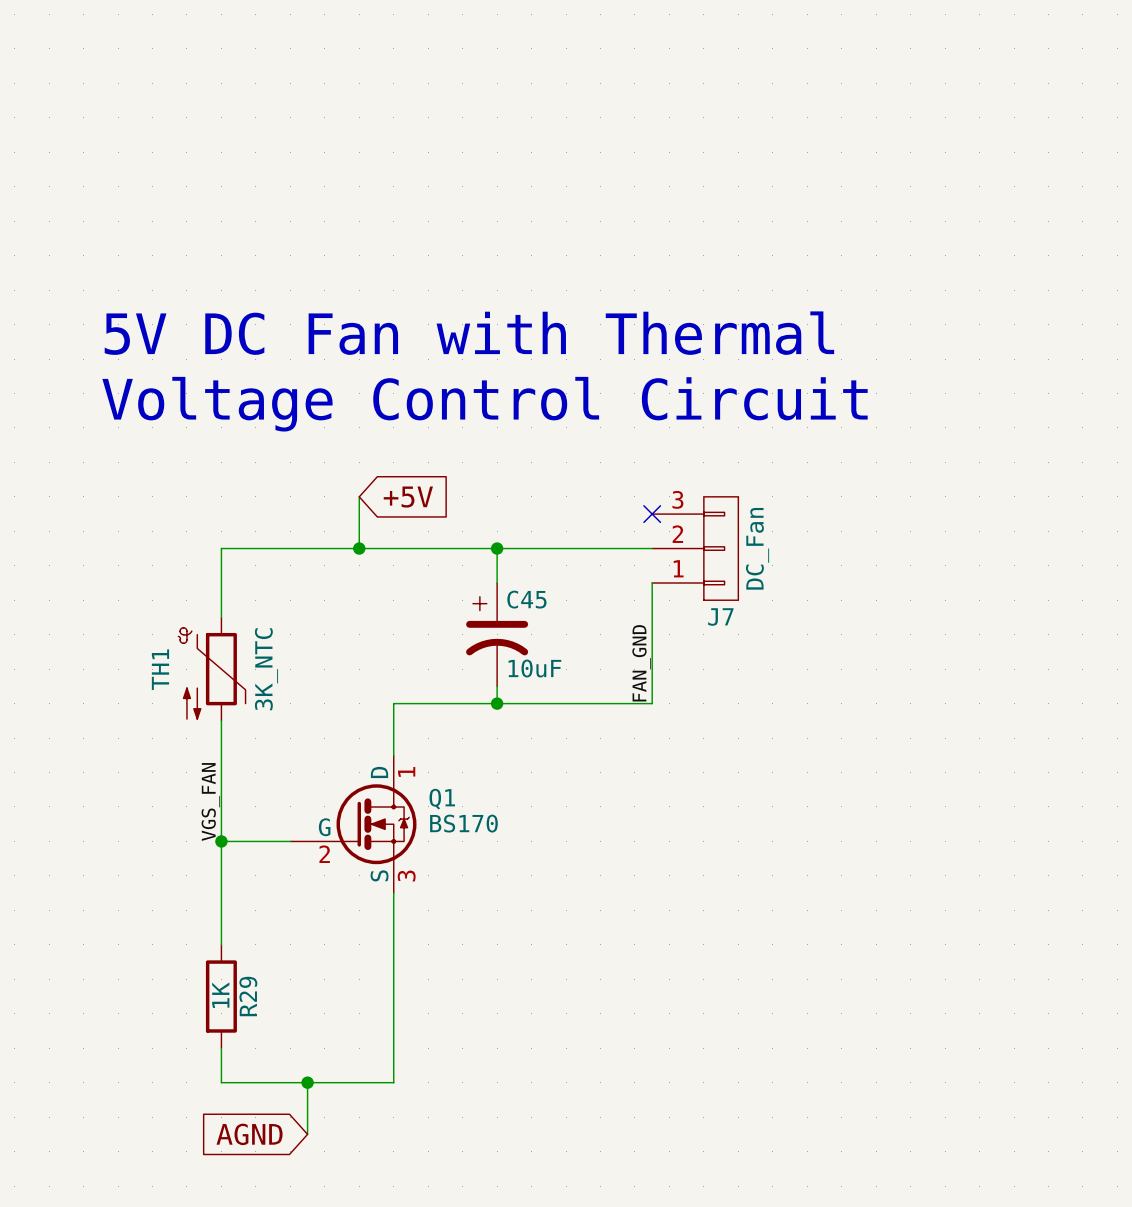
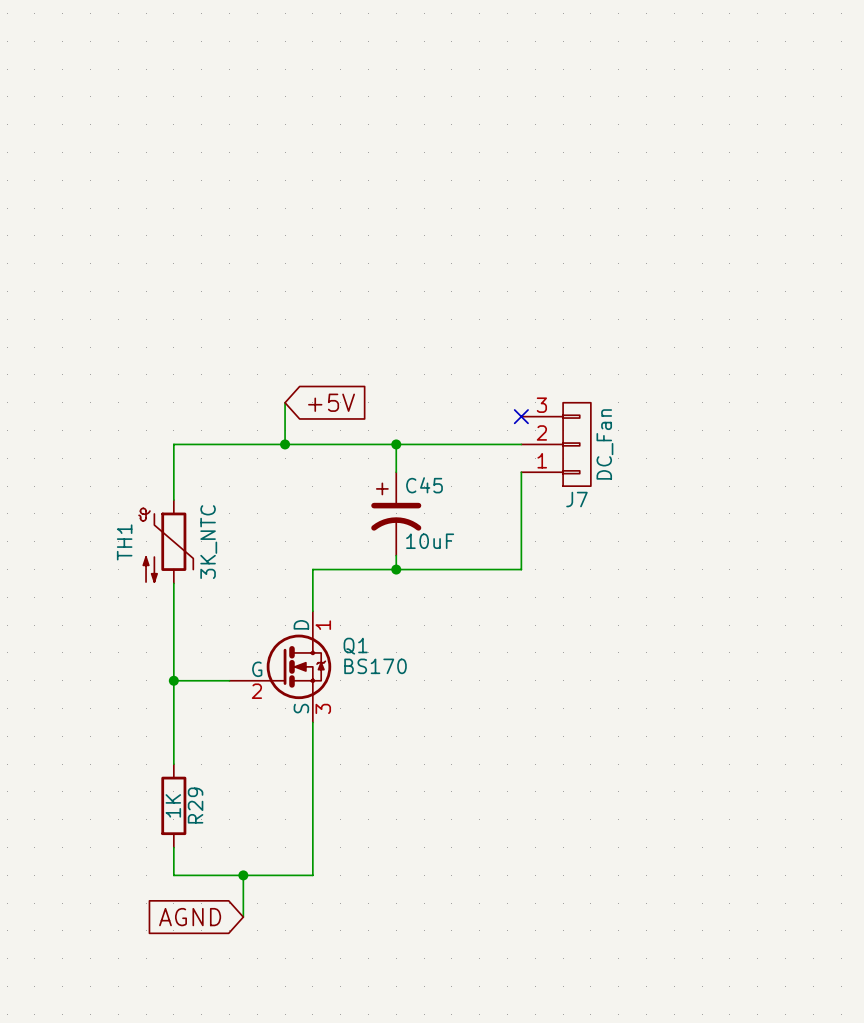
text: 5V DC Fan with Thermal (469, 333) -> none
text: Voltage Control Circuit (485, 404) -> none
label: FAN_GND (641, 663) -> none
label: VGS_FAN (210, 801) -> none

